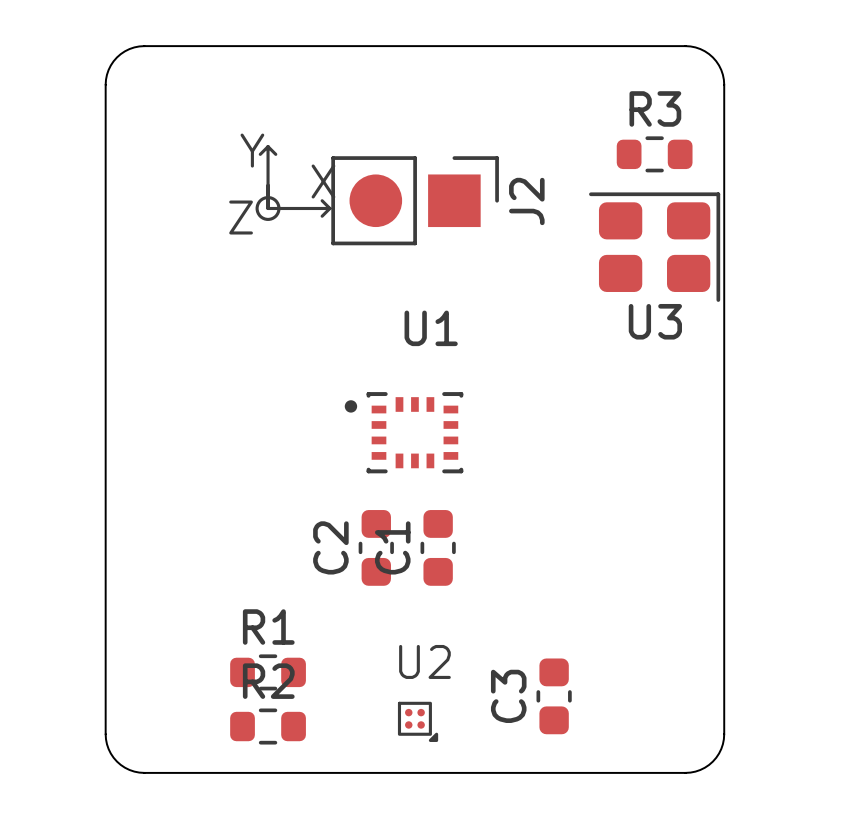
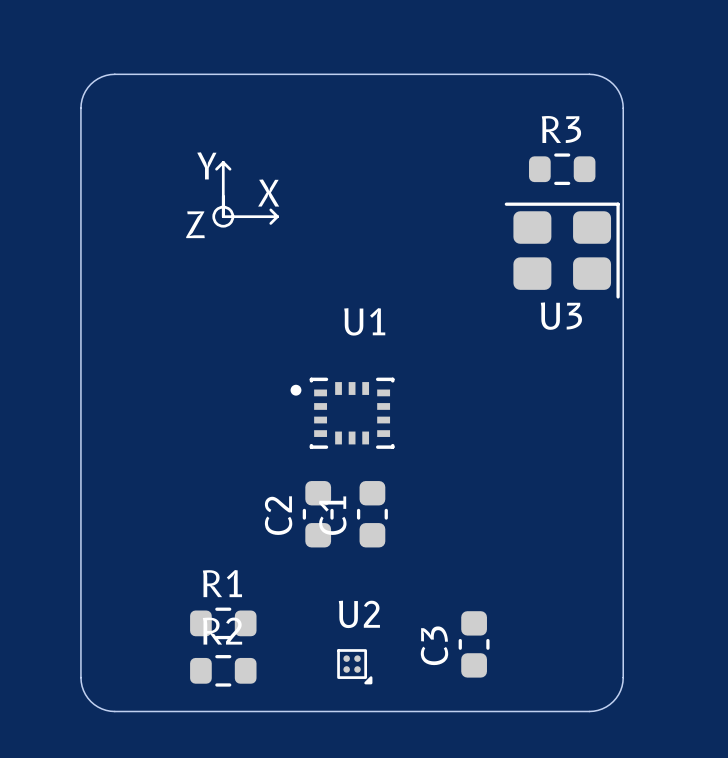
J2: (415, 200) -> none

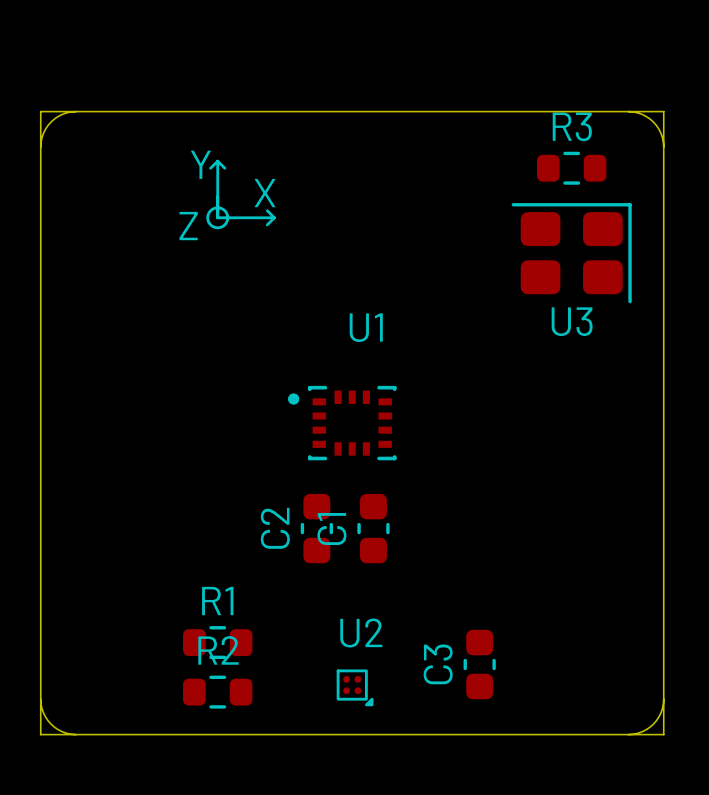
board edge: none -> (76, 111) (62, 114) (51, 121) (43, 133) (40, 147)
board edge: none -> (628, 111) (641, 114) (653, 121) (661, 133) (663, 147)
board edge: none -> (40, 699) (43, 712) (51, 724) (62, 731) (76, 734)
board edge: none -> (663, 699) (661, 712) (653, 724) (641, 731) (628, 734)
board edge: (114, 711) (101, 708) (90, 701) (83, 690) (80, 677) (80, 108) (83, 95) (90, 84) (101, 76) (114, 74) (589, 74) (602, 76) (616, 87) (622, 99) (623, 108) (623, 677) (620, 690) (613, 701) (602, 708) (589, 711) -> (104, 734) (40, 734) (40, 111) (663, 111) (663, 734) (600, 734)

